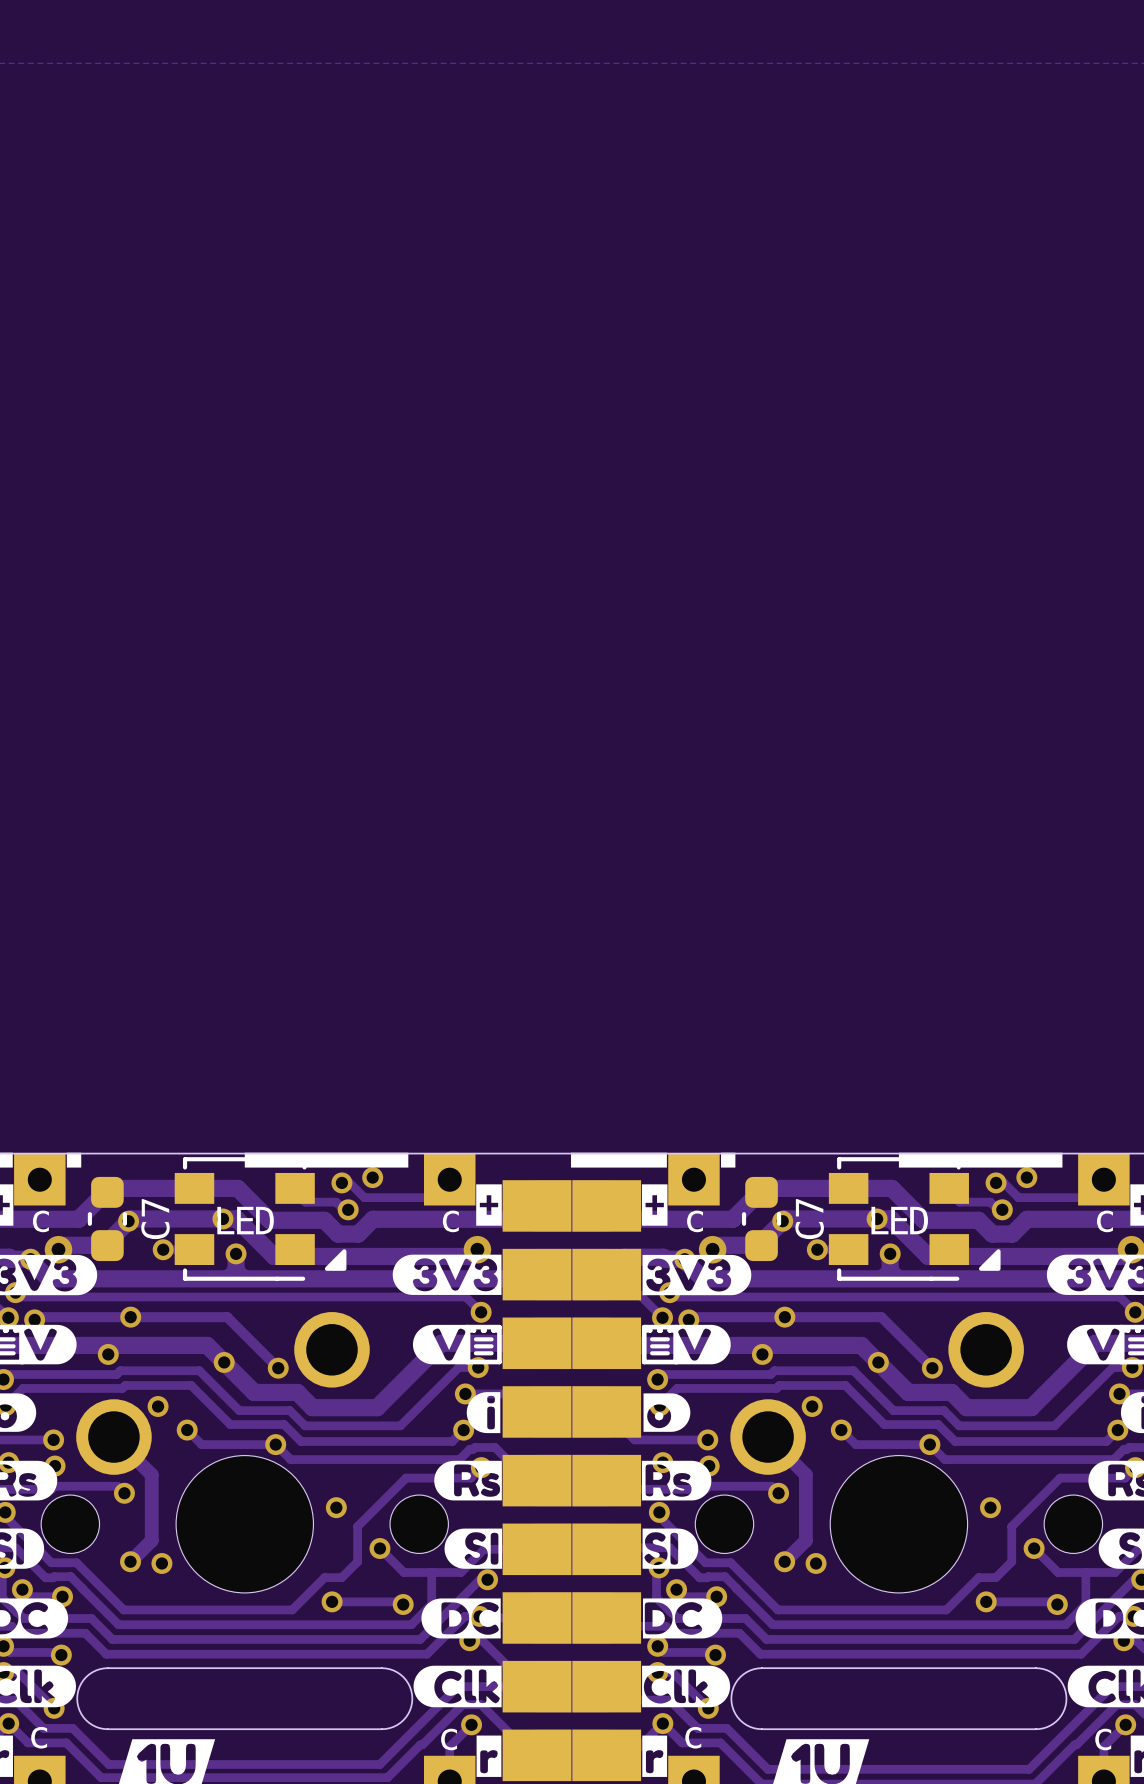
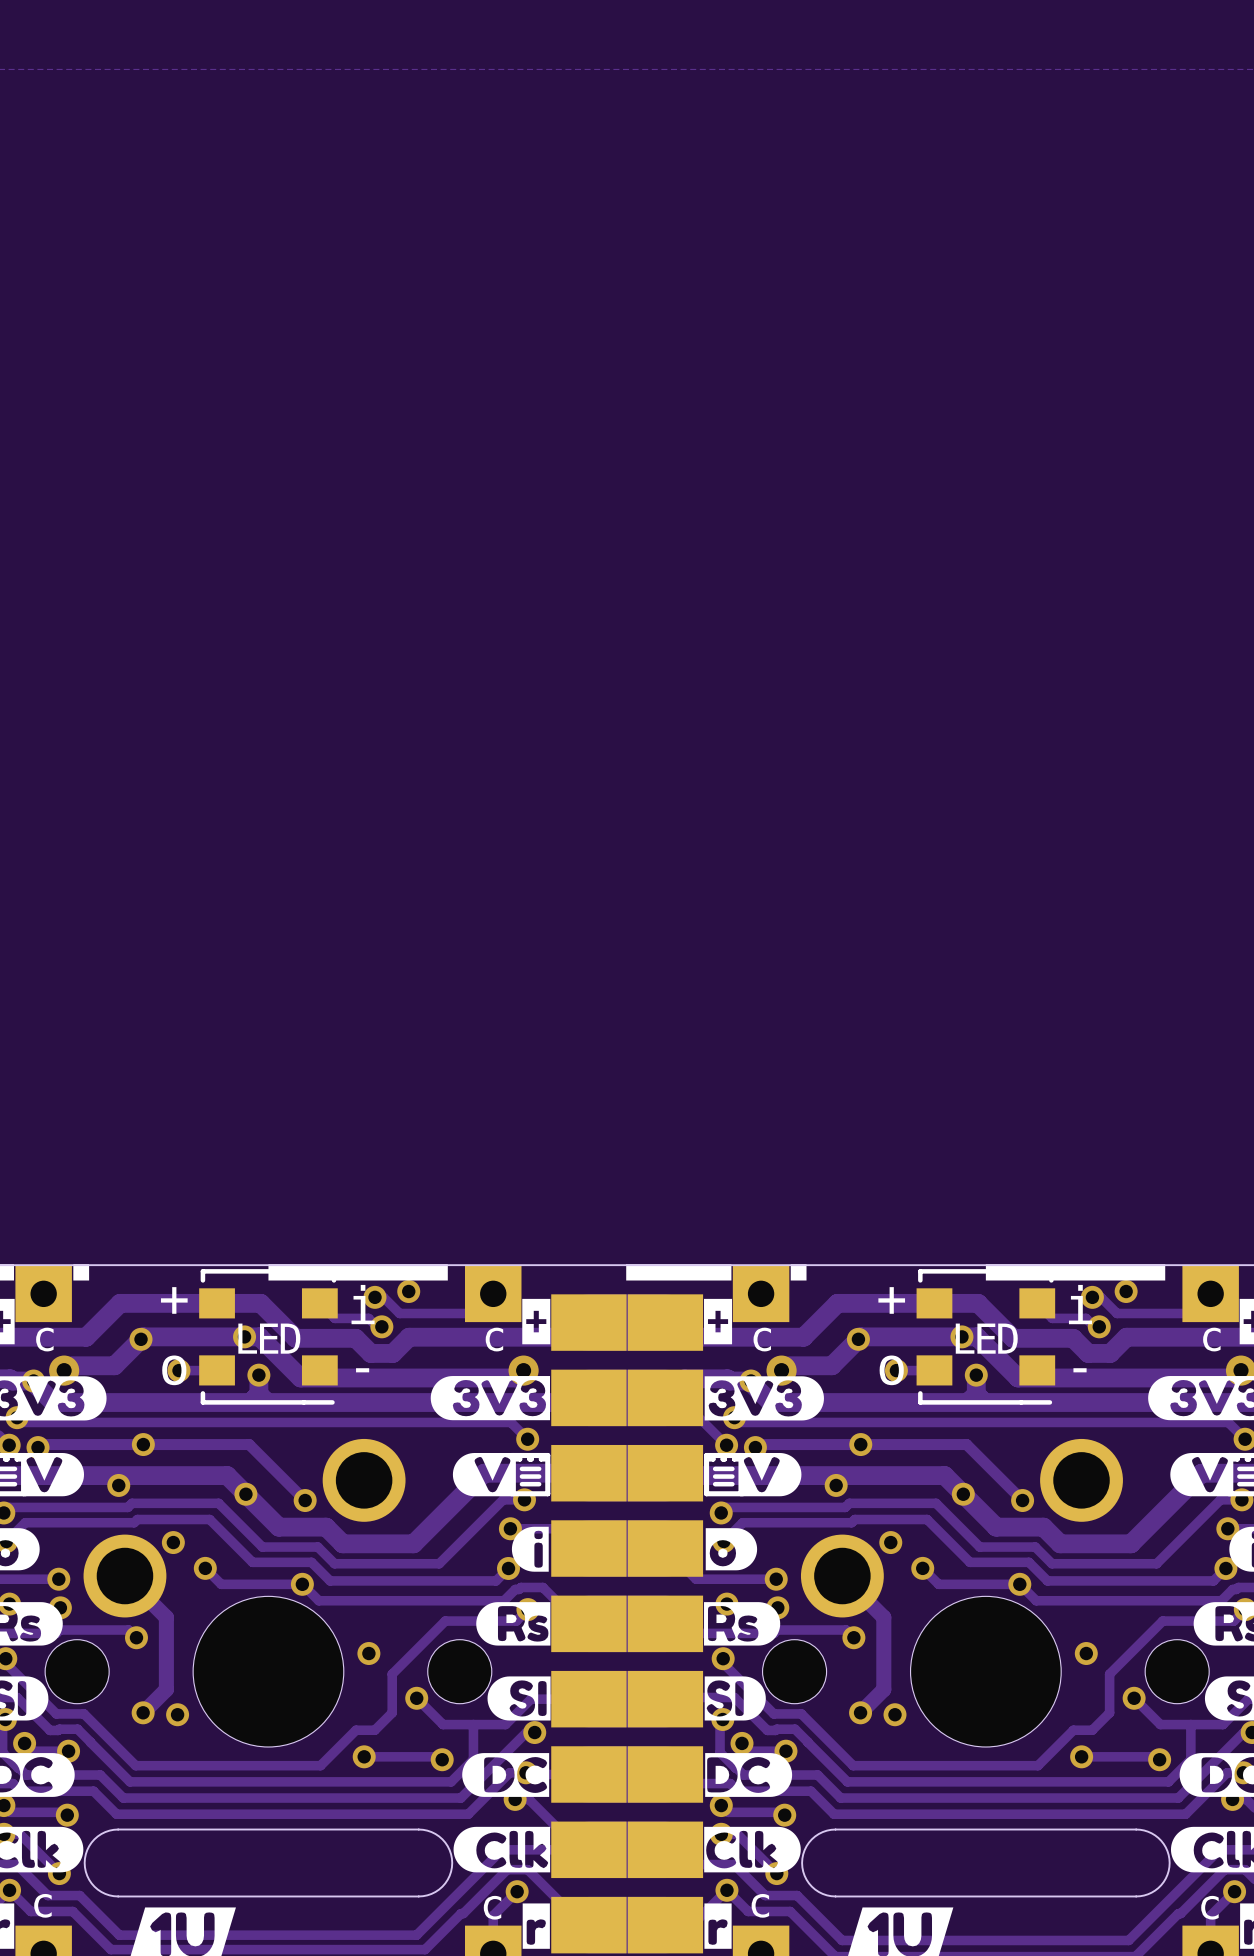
part footprint: [174, 1157, 347, 1281] -> [199, 1269, 338, 1405]
part footprint: [828, 1157, 1001, 1281] -> [916, 1269, 1056, 1405]
C7: (107, 1218) -> none
C7: (761, 1218) -> none

